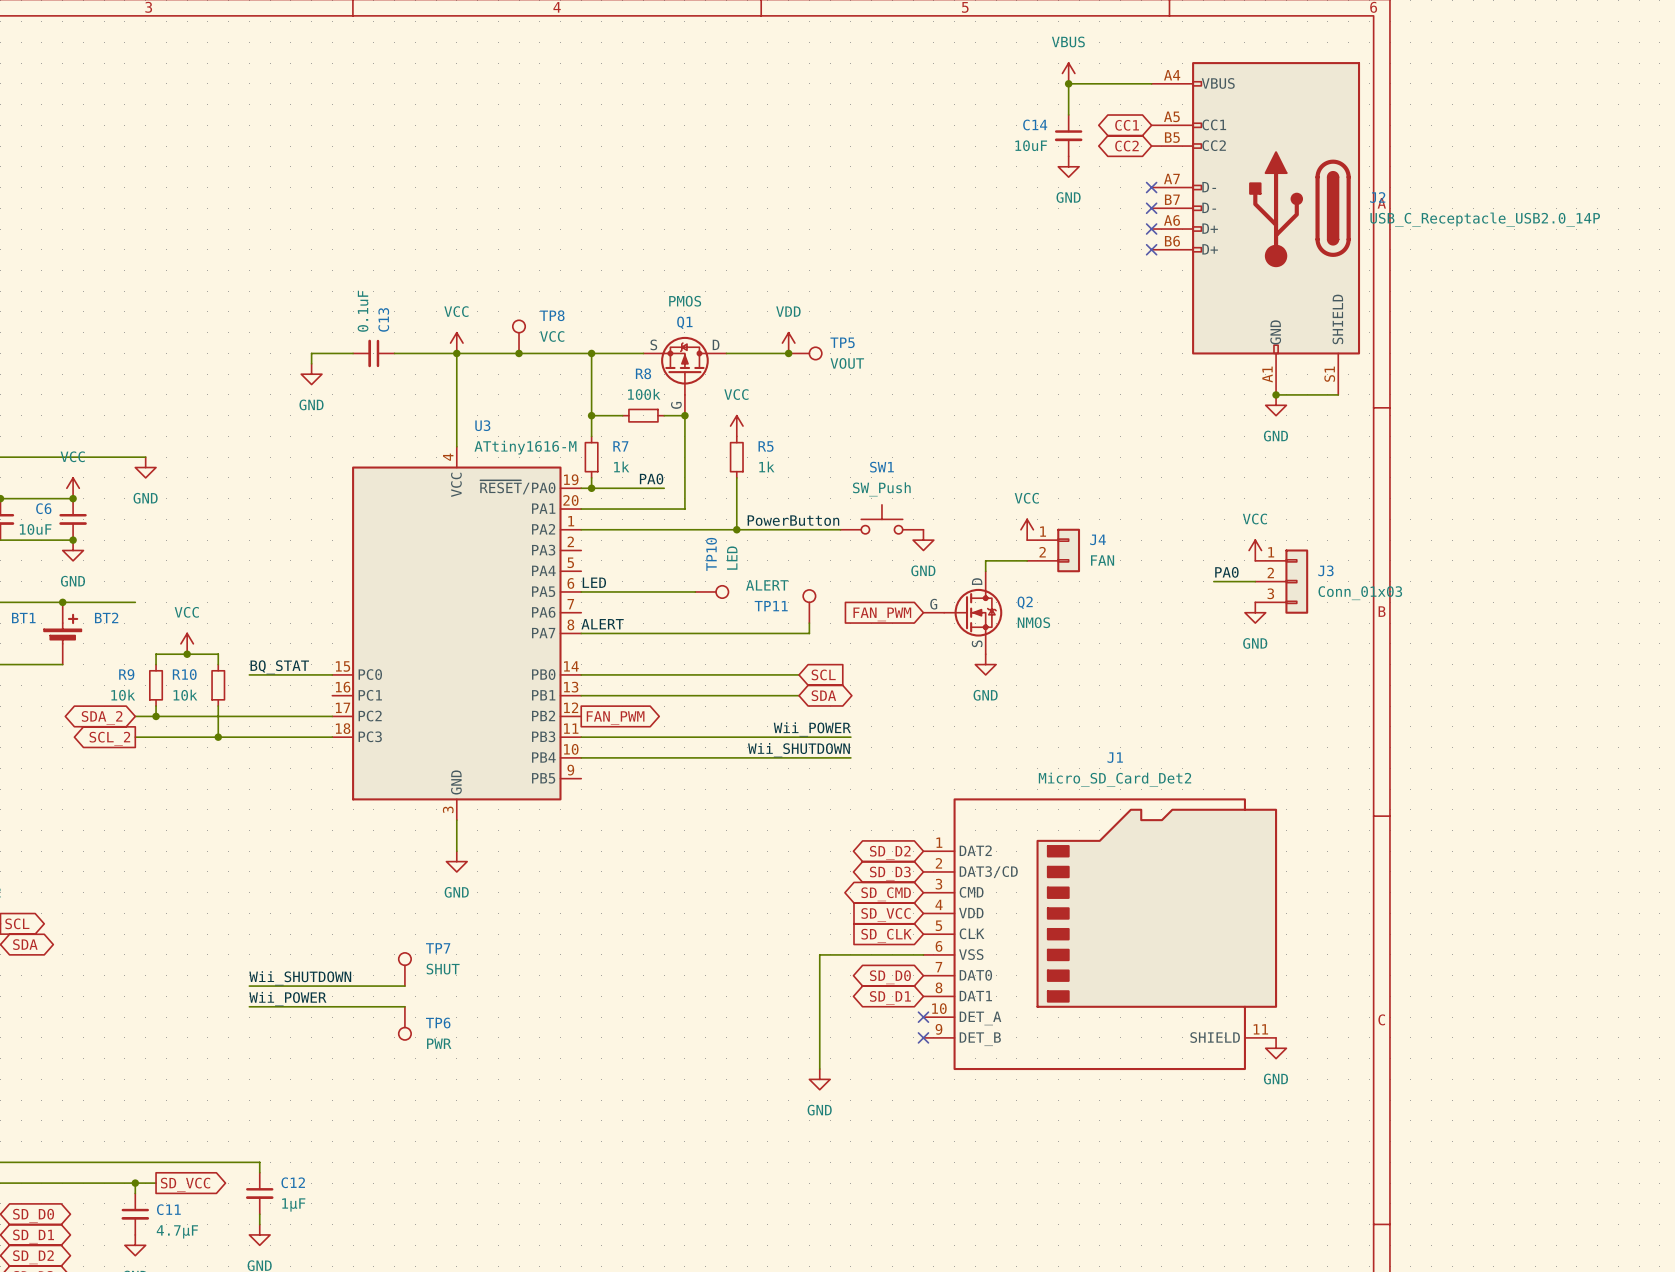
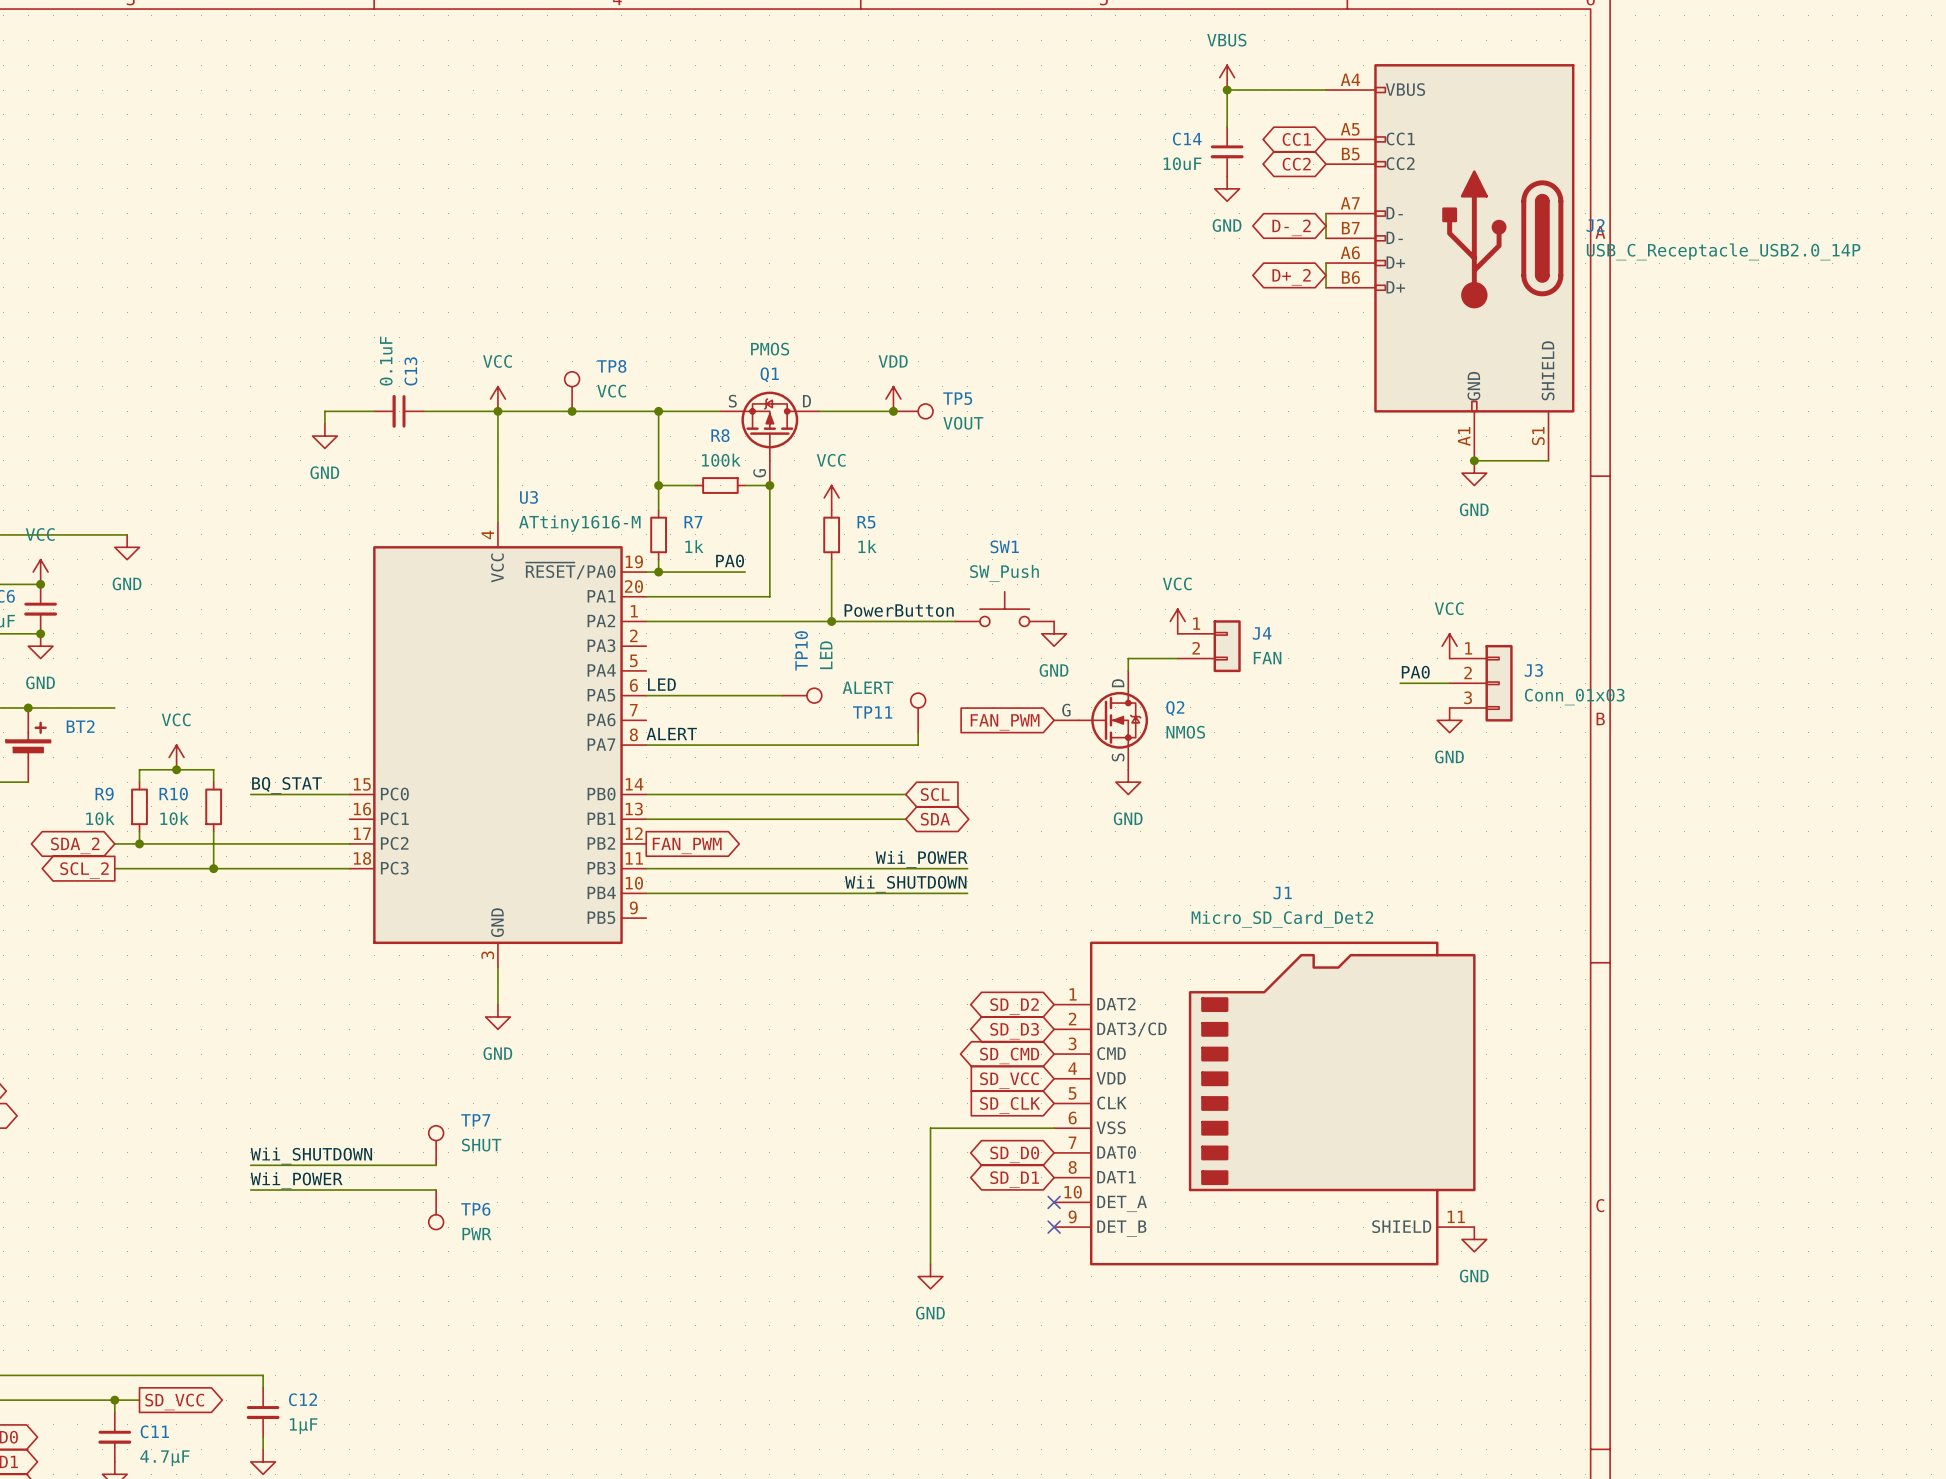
wire: none -> (1326, 213) (1326, 238)
no-connect mark: (1151, 187) -> none
global label: none -> D-_2 (1291, 227)
no-connect mark: (1151, 208) -> none
wire: none -> (1326, 263) (1326, 287)
no-connect mark: (1151, 229) -> none
global label: none -> D+_2 (1291, 277)
no-connect mark: (1151, 249) -> none

